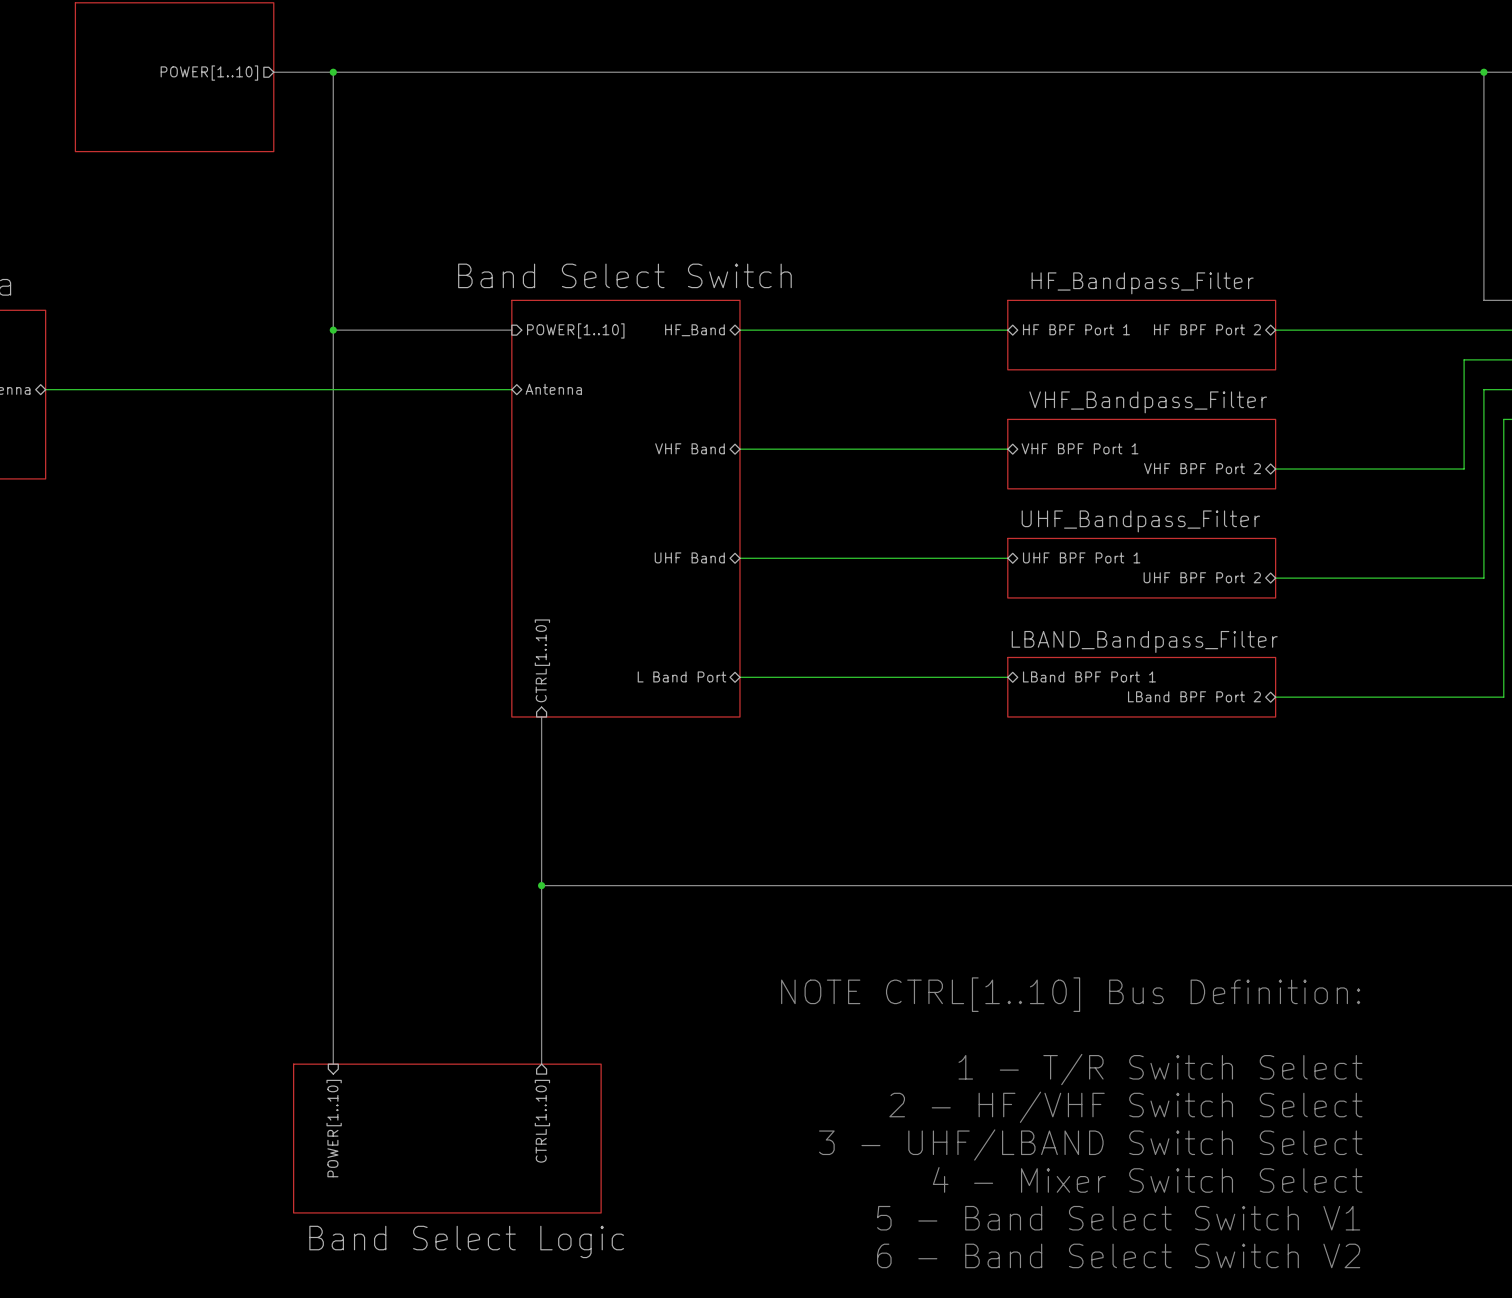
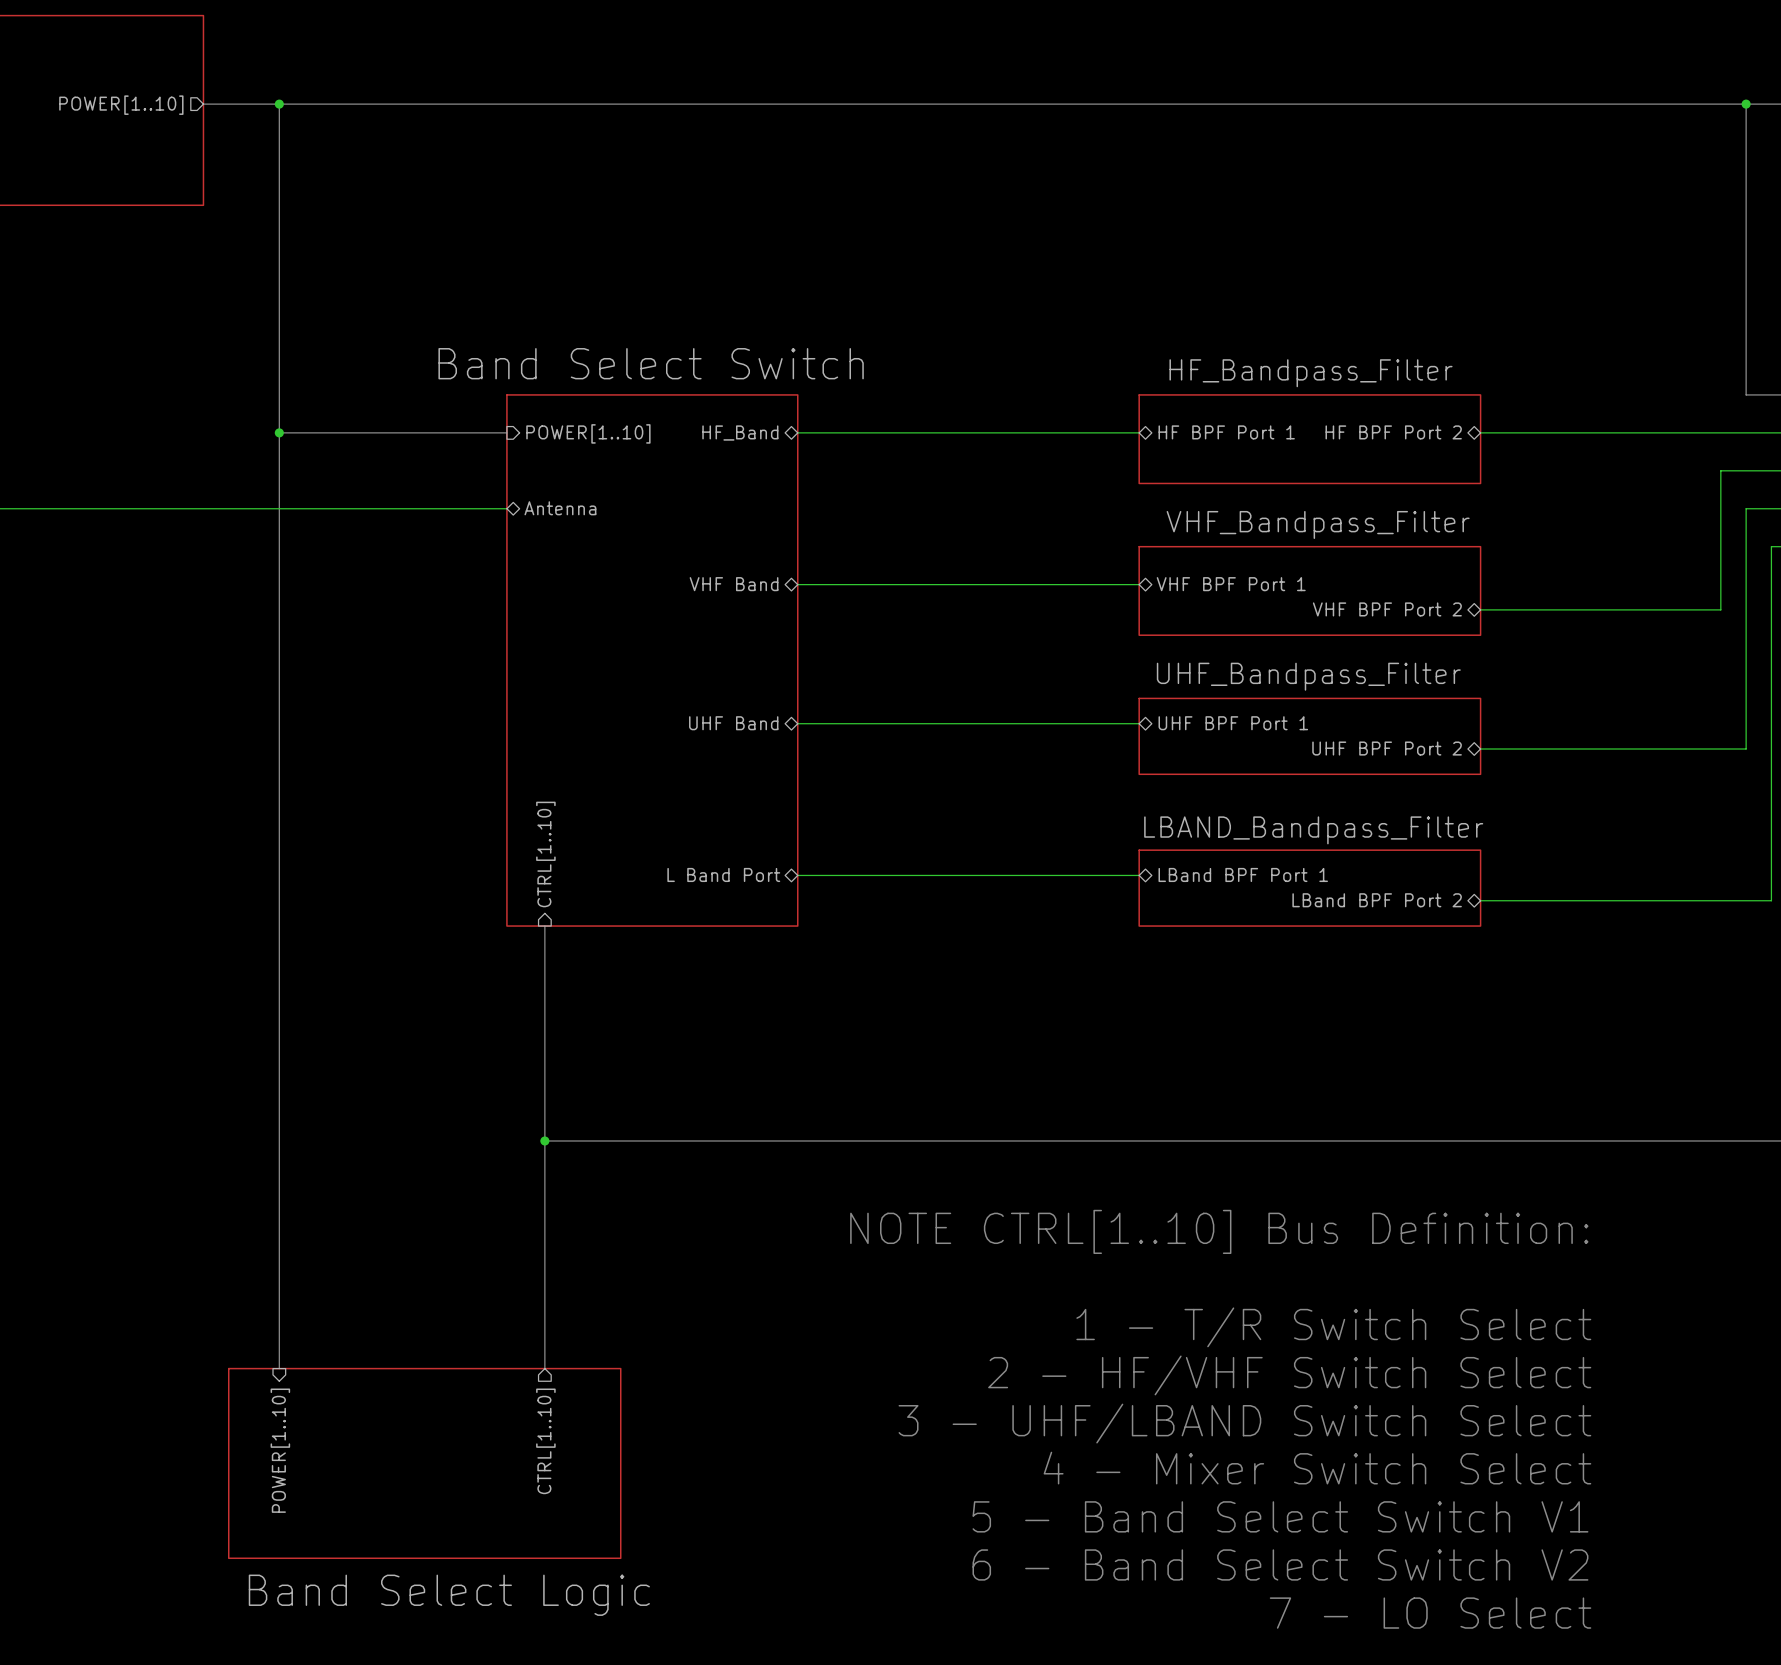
text position: NOTE CTRL[1..10] Bus Definition: (1070, 994) -> NOTE CTRL[1..10] Bus Definition: (1219, 1231)
text: none -> 1 - T/R Switch Select (1333, 1327)
text: 1 - T/R Switch Select (1160, 1069) -> 2 - HF/VHF Switch Select (1289, 1375)
text: 2 - HF/VHF Switch Select (1125, 1107) -> 3 - UHF/LBAND Switch Select (1244, 1423)
text: 3 - UHF/LBAND Switch Select (1090, 1144) -> 4 - Mixer Switch Select (1317, 1468)
text: 4 - Mixer Switch Select (1147, 1179) -> 5 - Band Select Switch V1 (1280, 1516)
text: 5 - Band Select Switch V1 (1118, 1218) -> 6 - Band Select Switch V2 (1280, 1564)
text: 6 - Band Select Switch V2 (1118, 1255) -> 7 - LO Select (1430, 1613)

